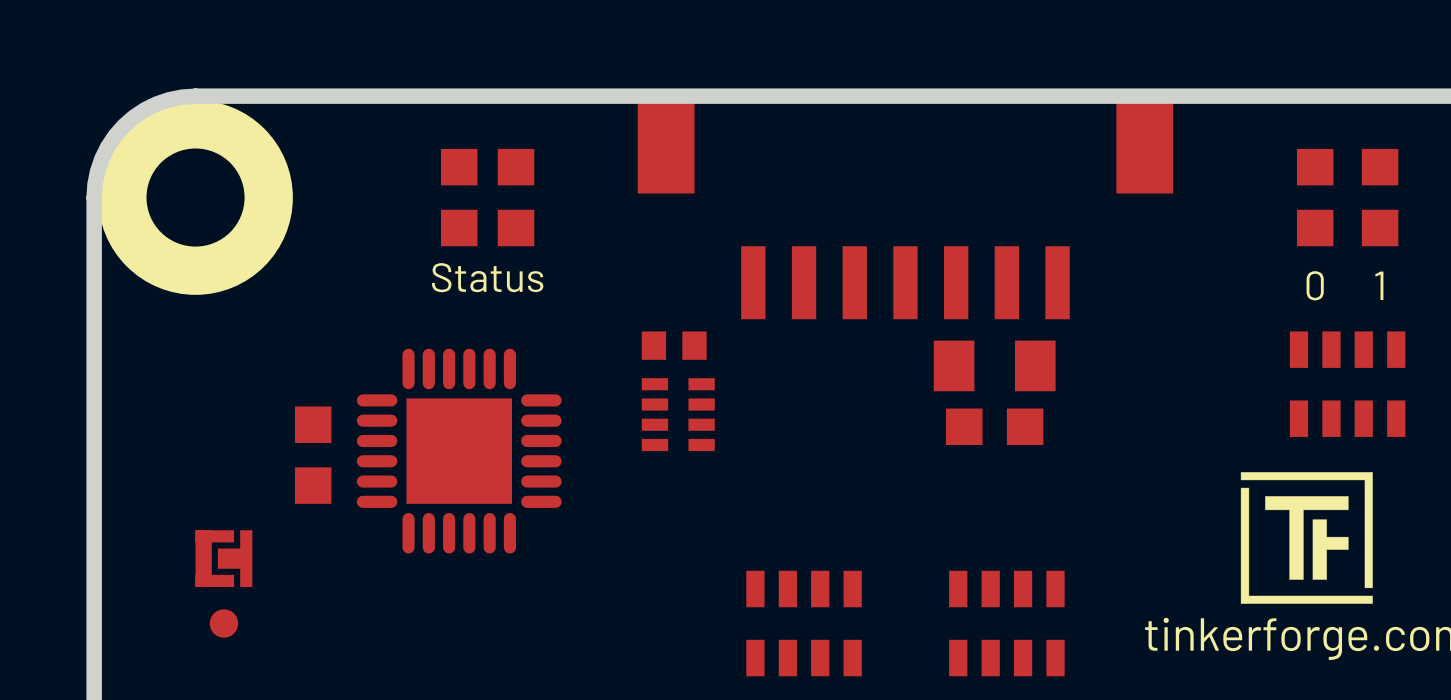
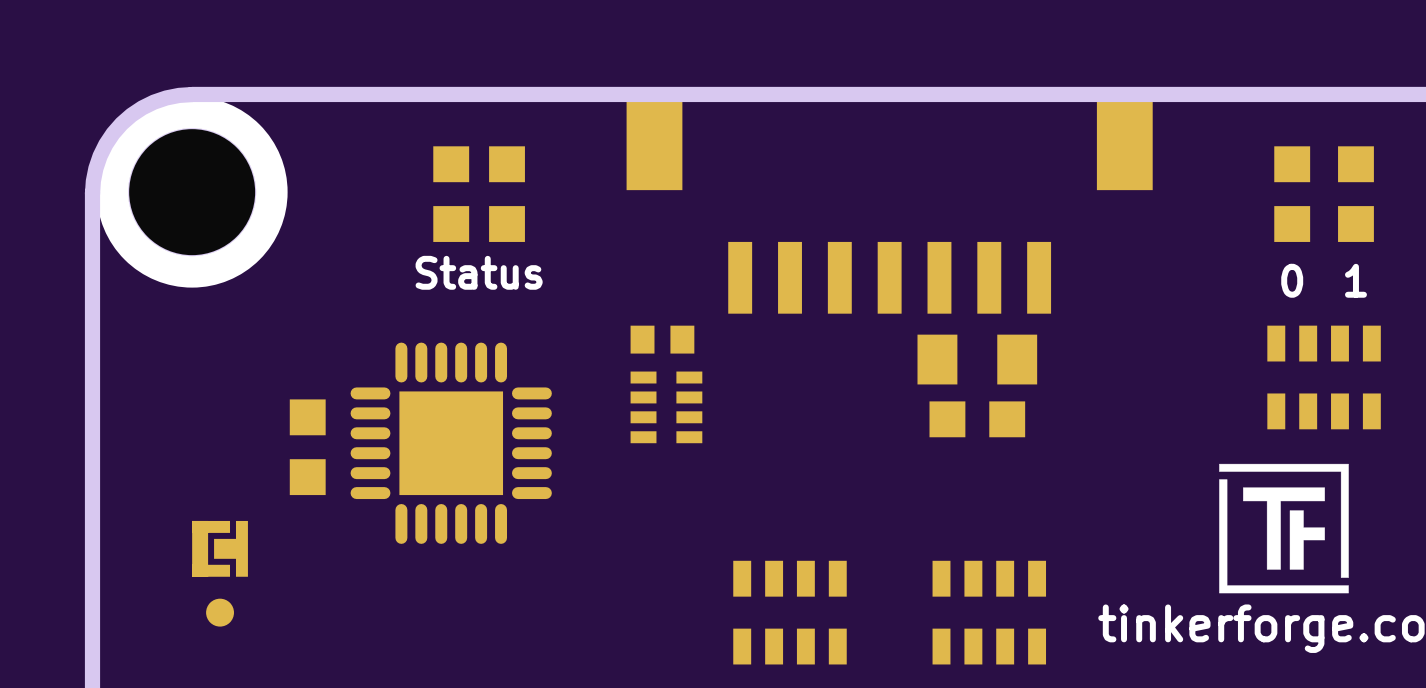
part footprint: [98, 100, 293, 295] -> [96, 96, 288, 288]

